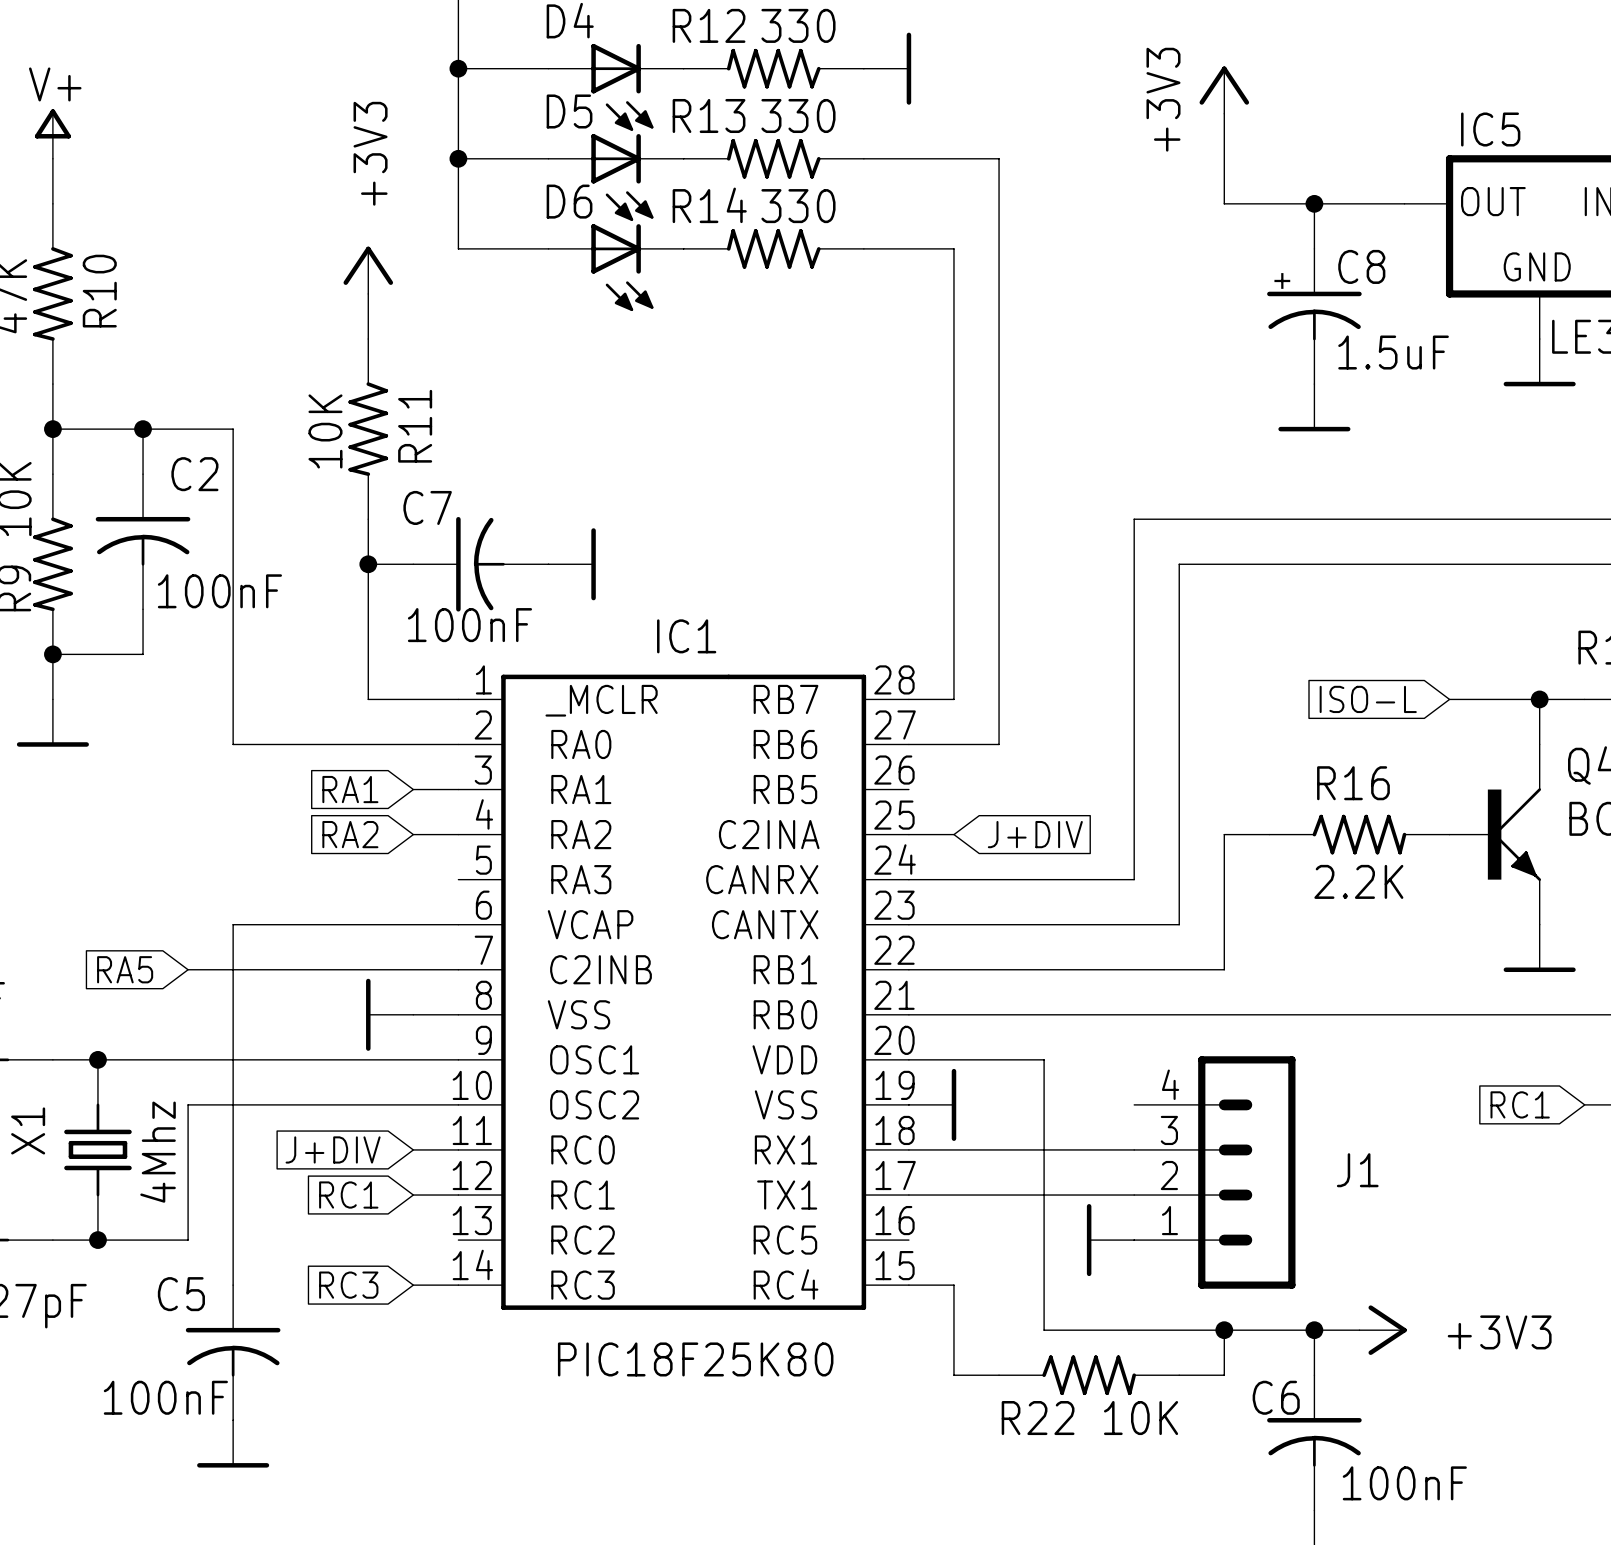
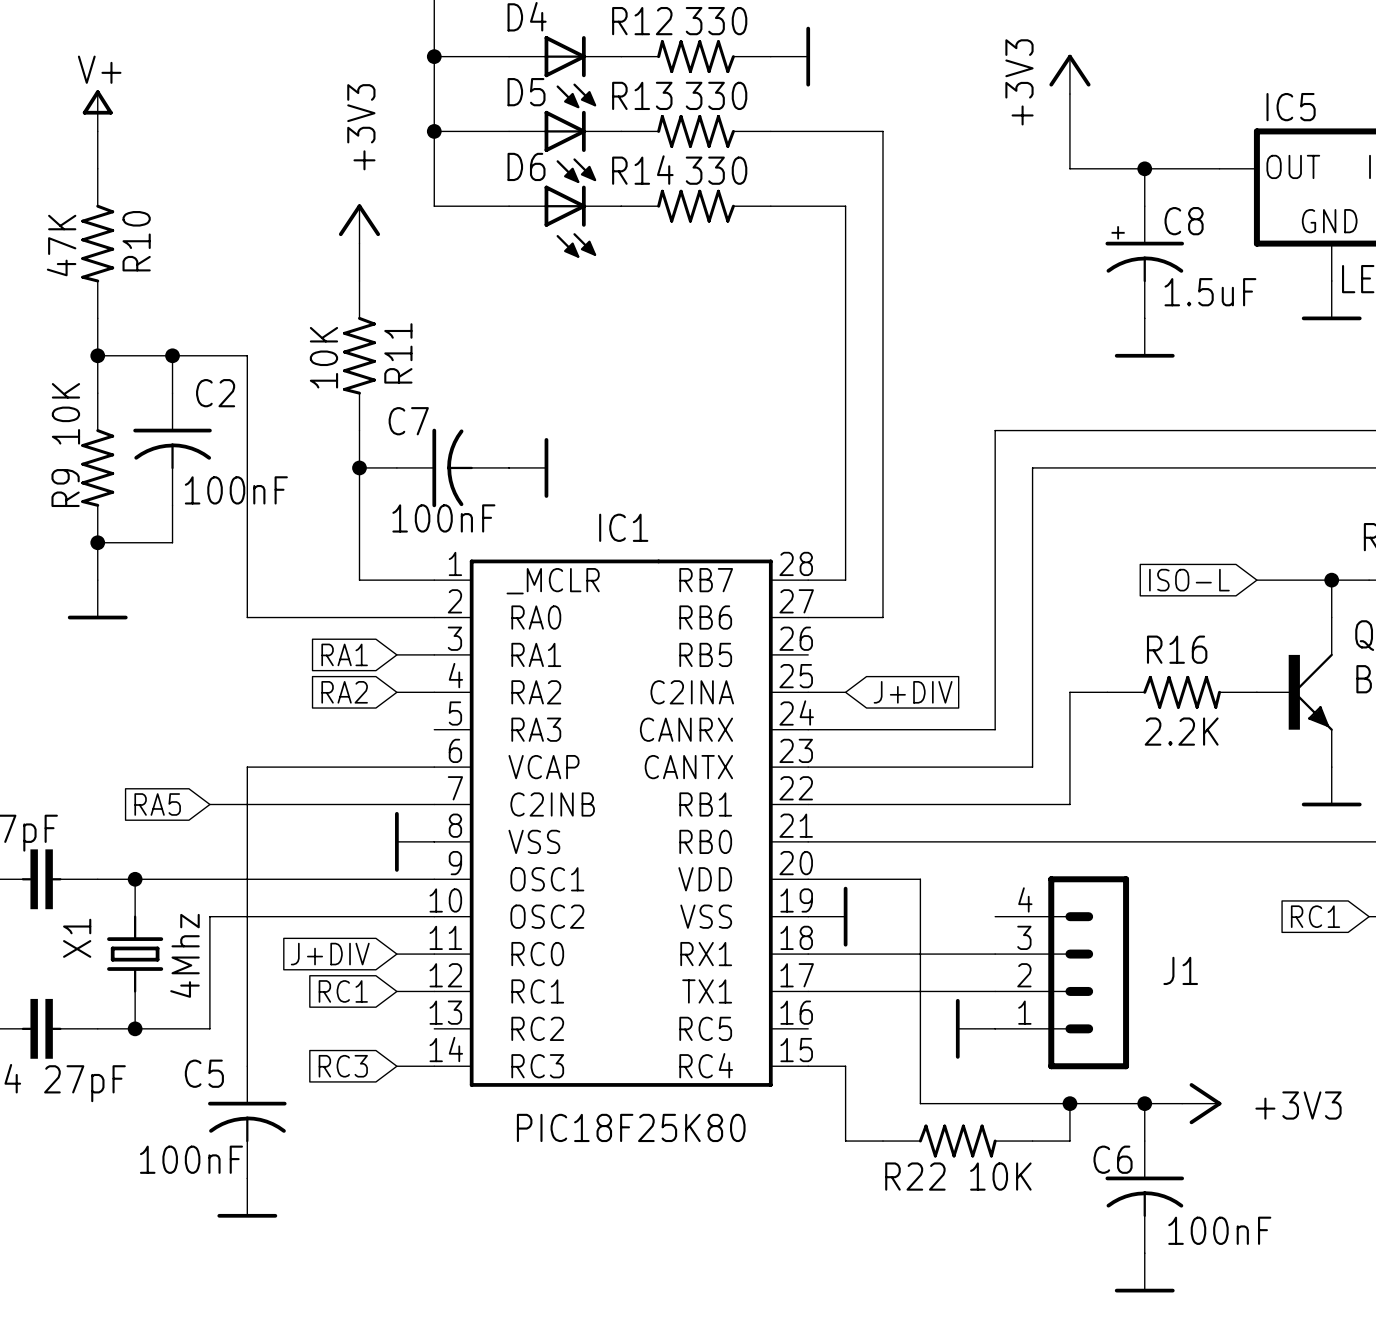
power symbol position: (389, 1014) -> (414, 841)

